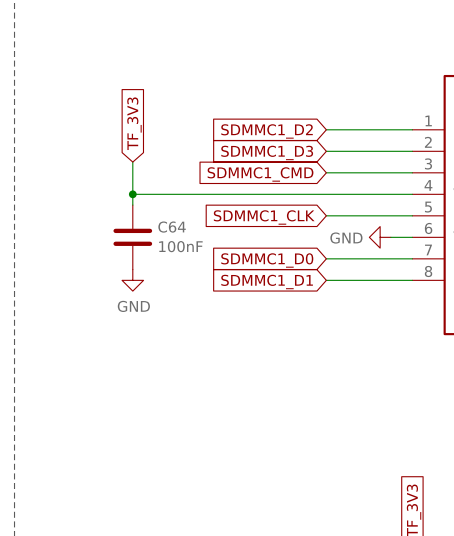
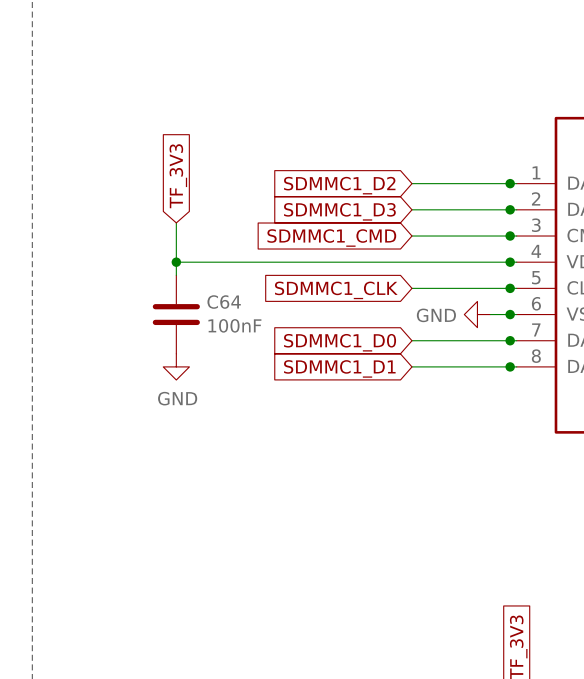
junction: none -> (510, 183)
junction: none -> (510, 209)
junction: none -> (510, 236)
junction: none -> (510, 262)
junction: none -> (510, 288)
junction: none -> (510, 314)
junction: none -> (510, 340)
junction: none -> (510, 366)

